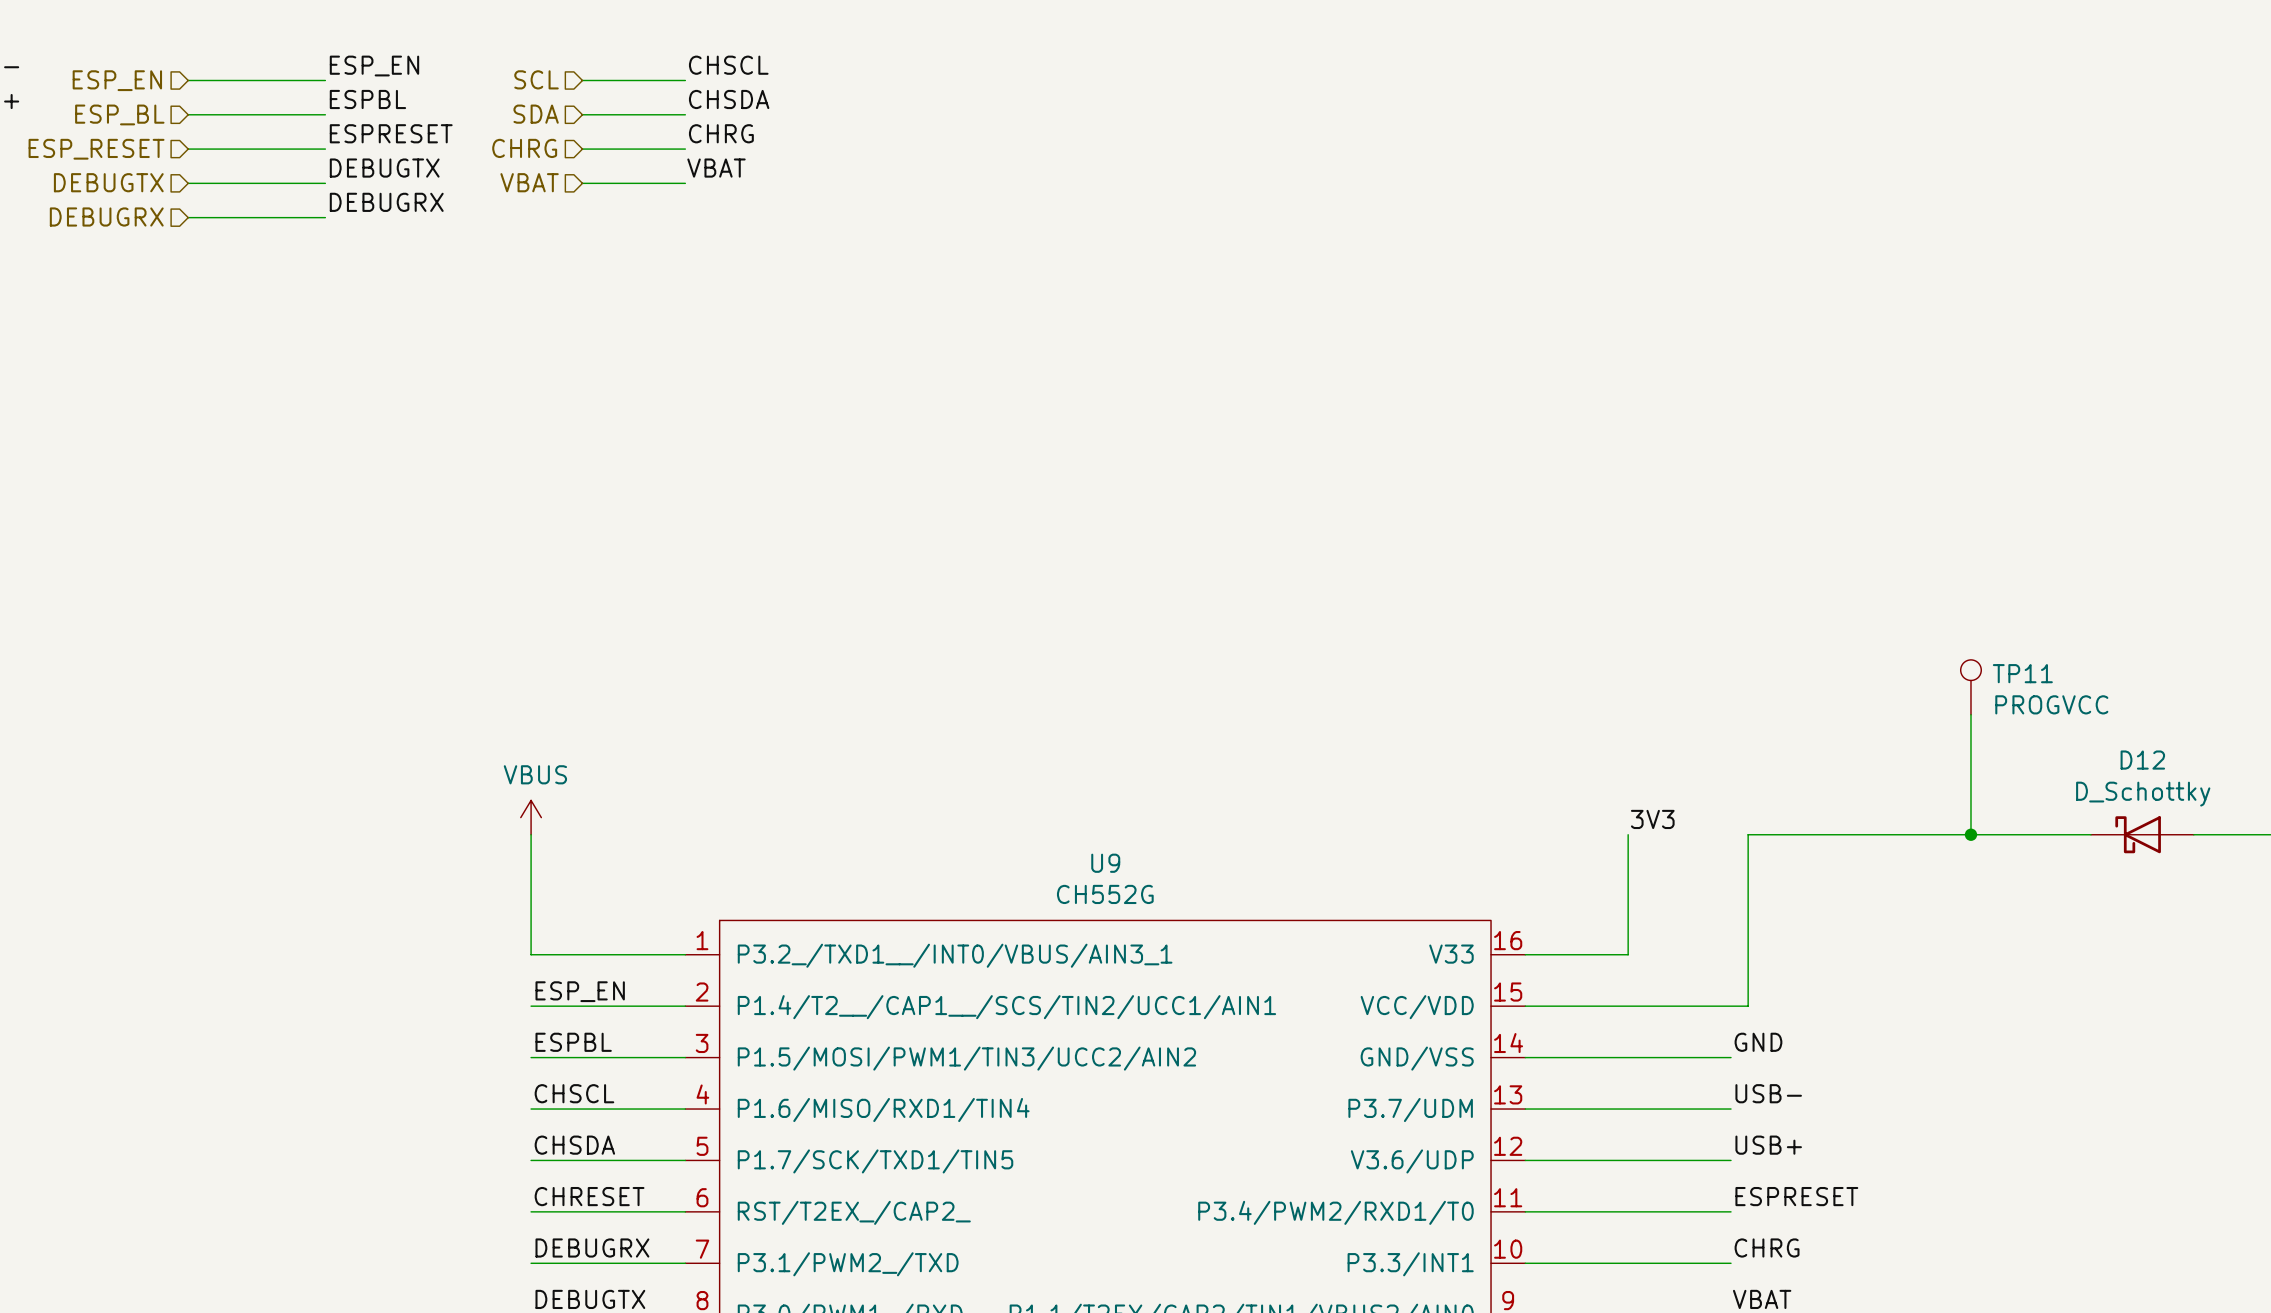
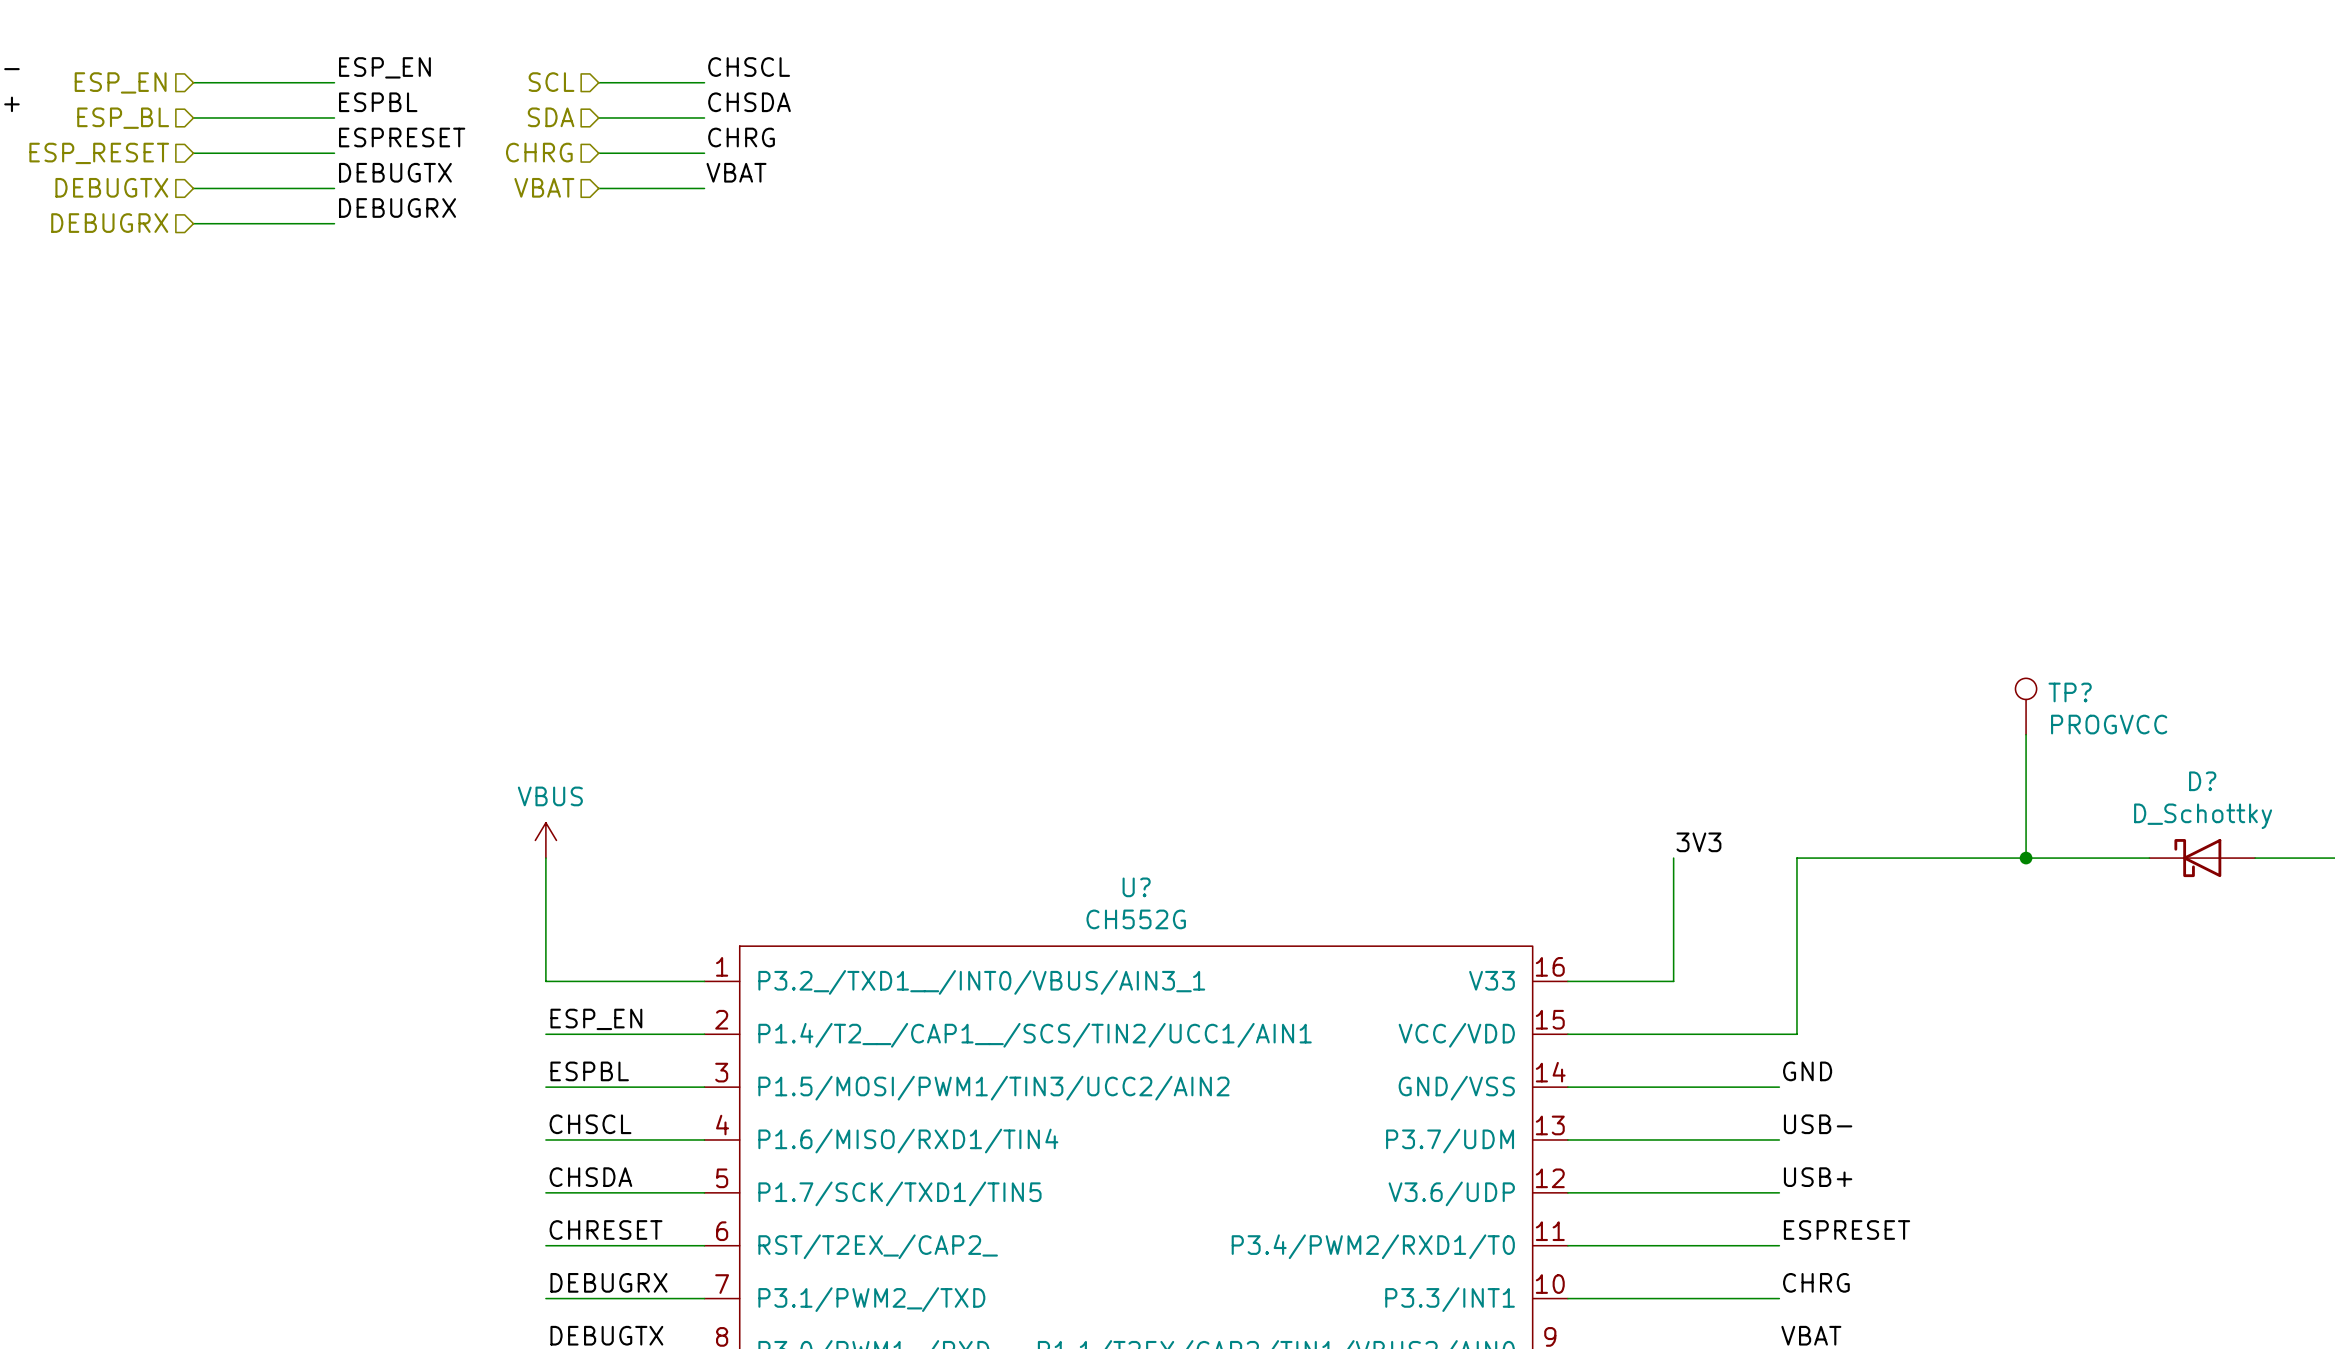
TP11 name: TP11 (2022, 673) -> TP? (2070, 692)
D12 name: D12 (2142, 760) -> D? (2202, 781)
U9 name: U9 (1105, 863) -> U? (1136, 887)

